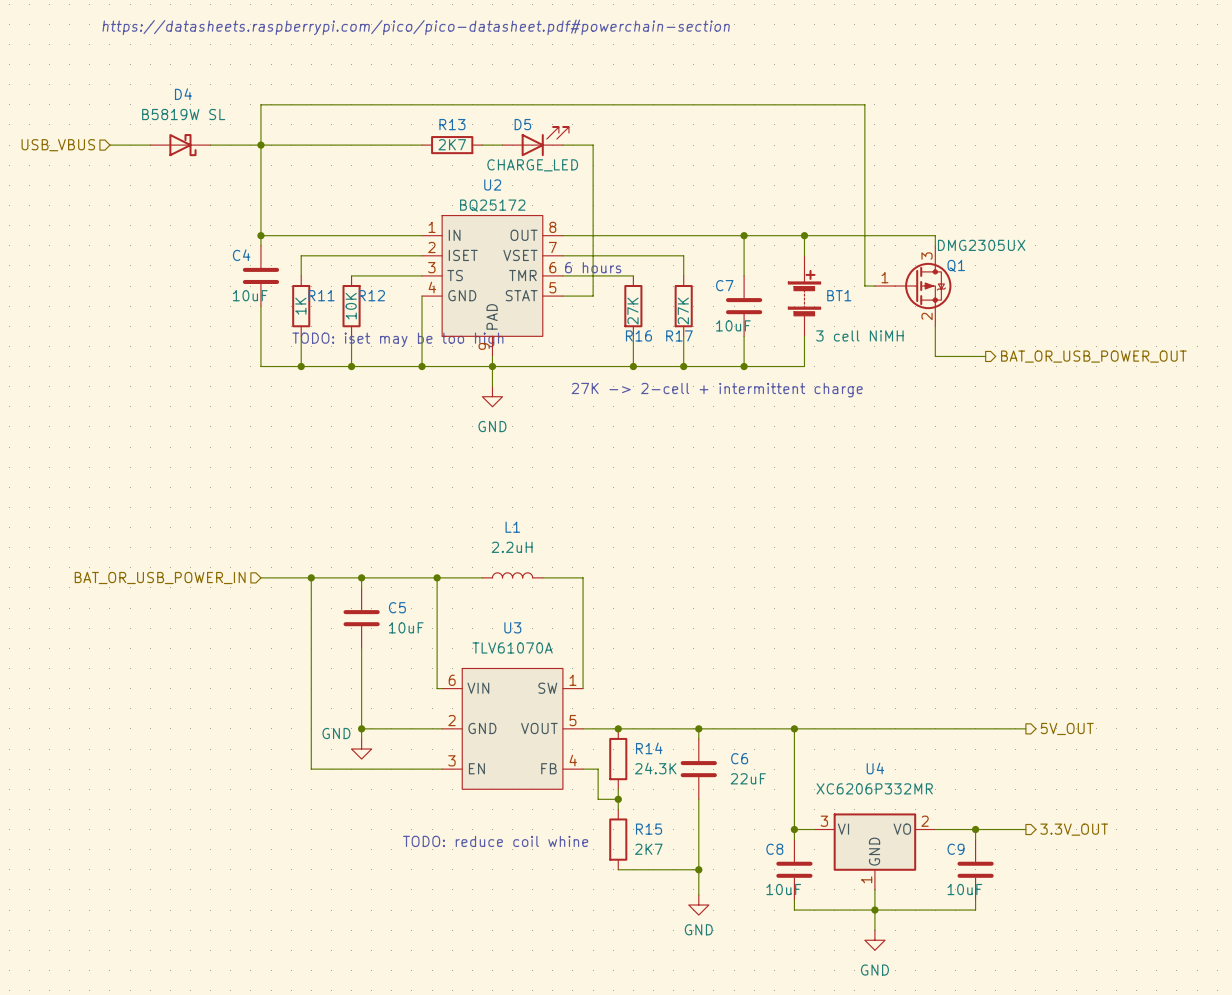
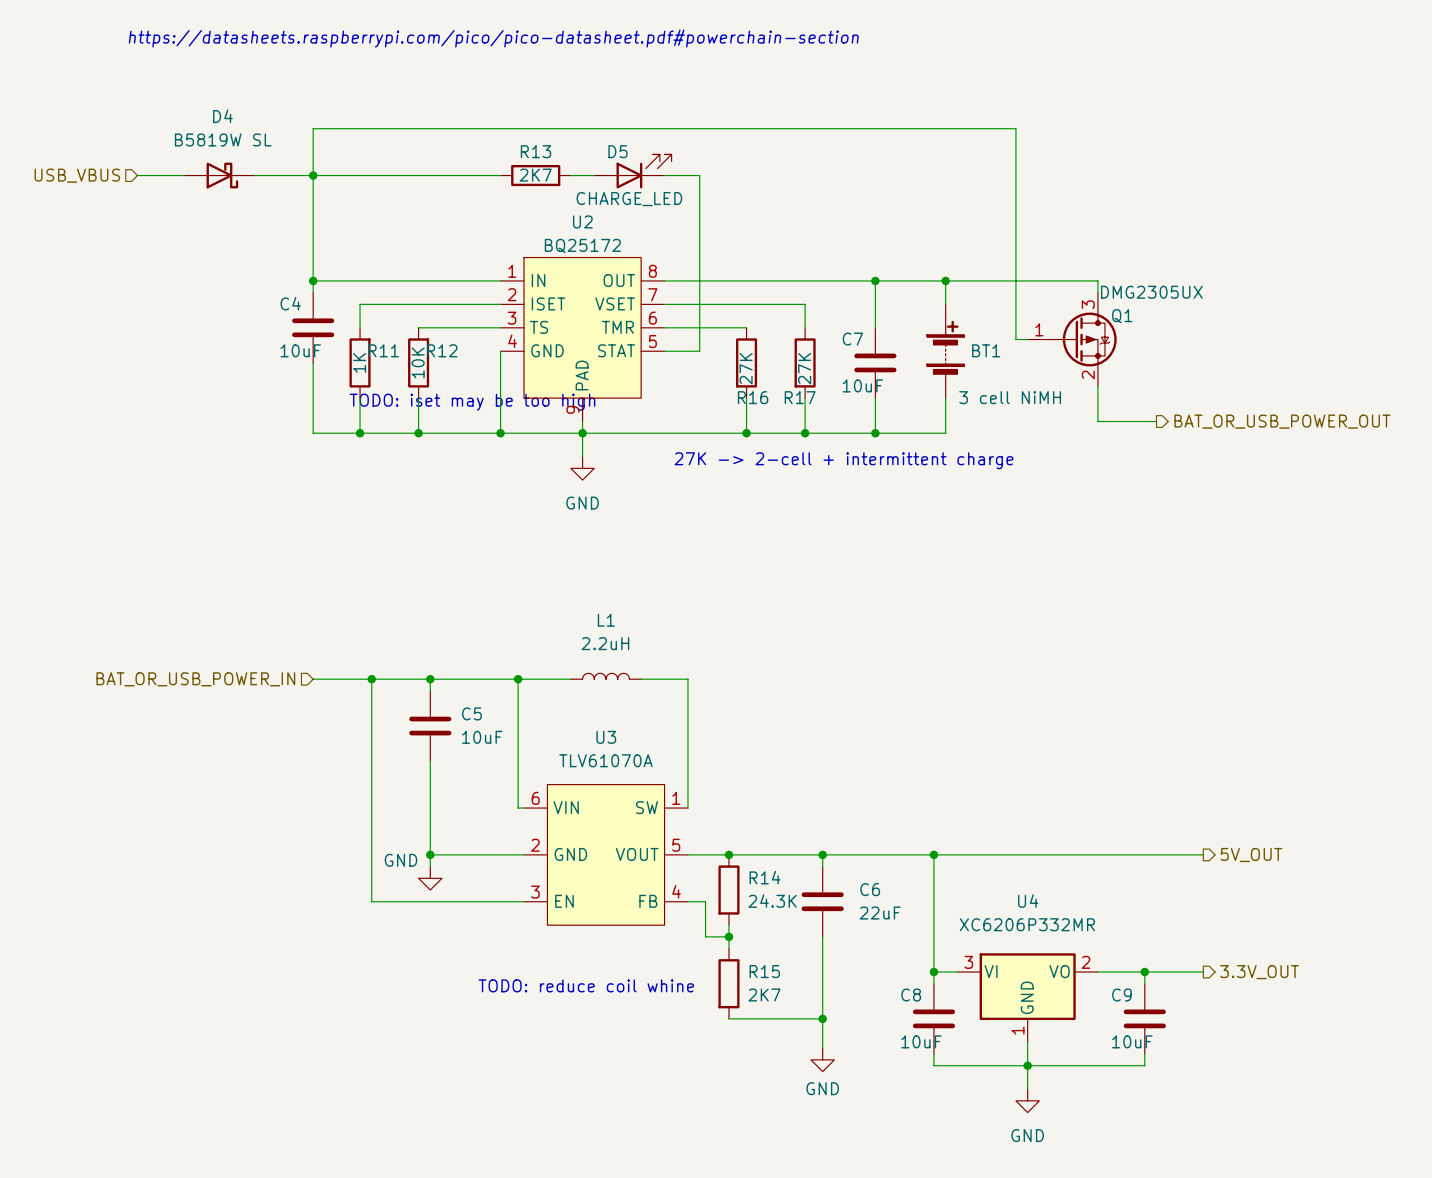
text: 6 hours (593, 267) -> none

